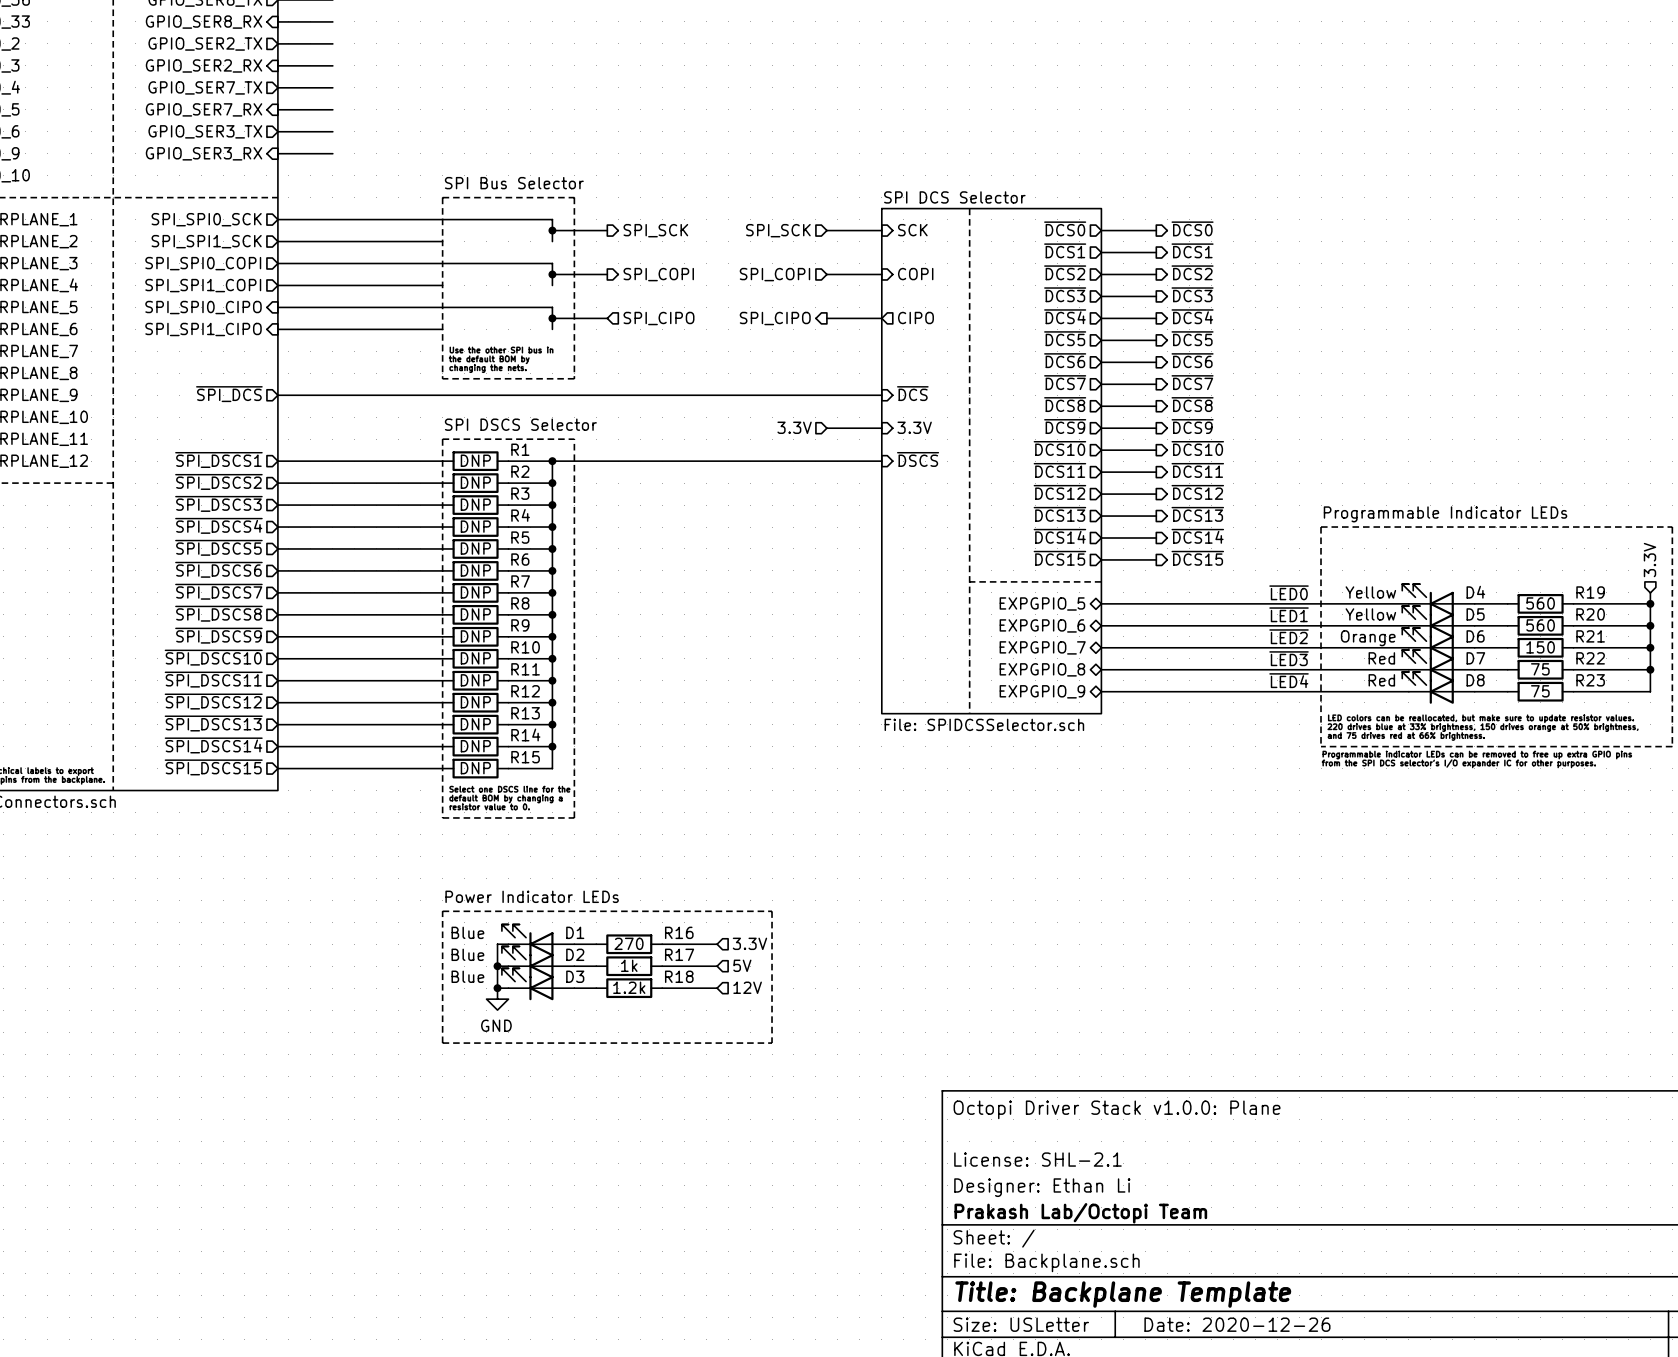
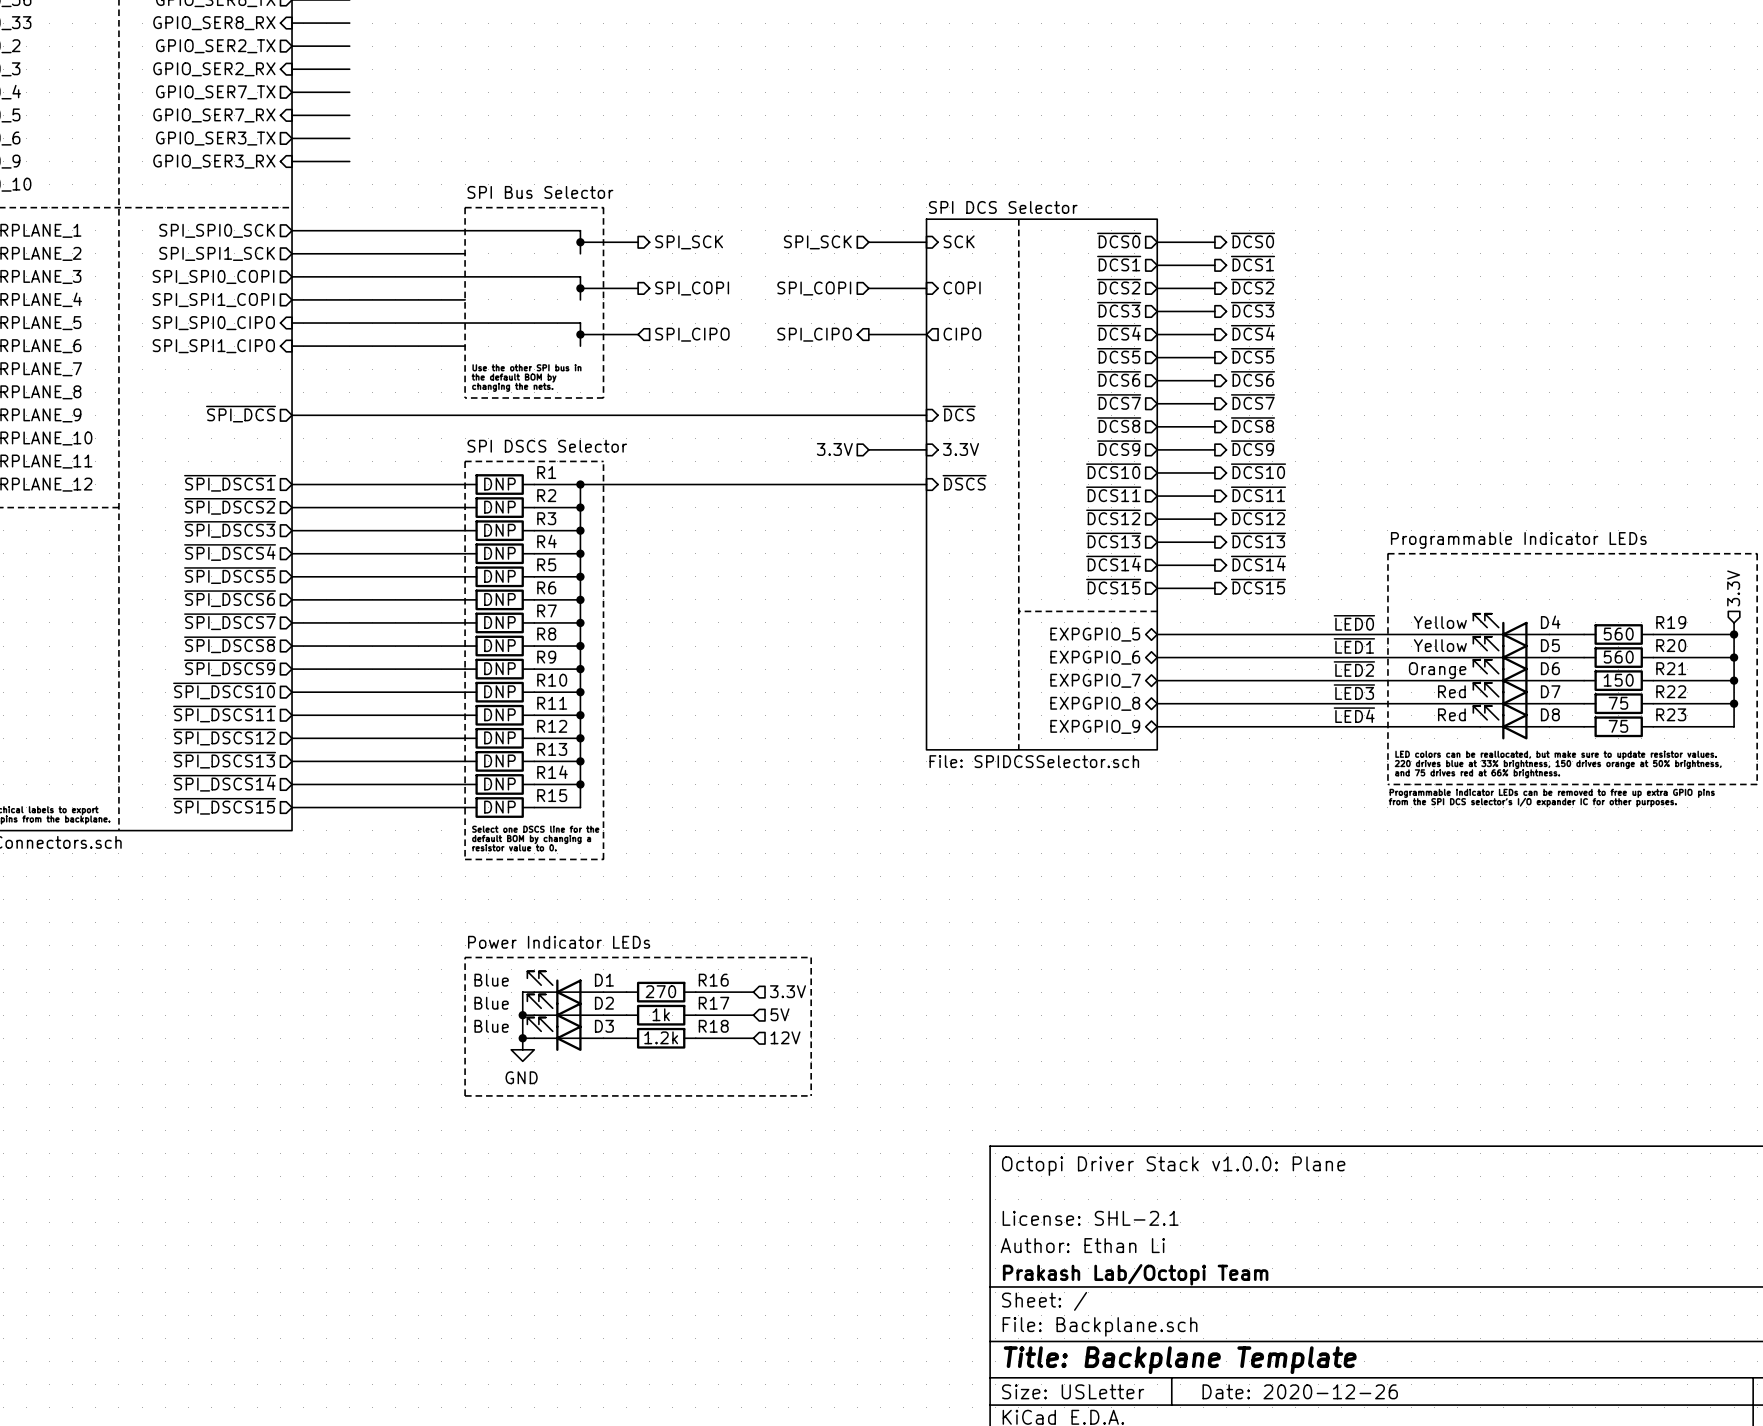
title block: Designer: Ethan Li (1042, 1187) -> Author: Ethan Li (1082, 1245)

